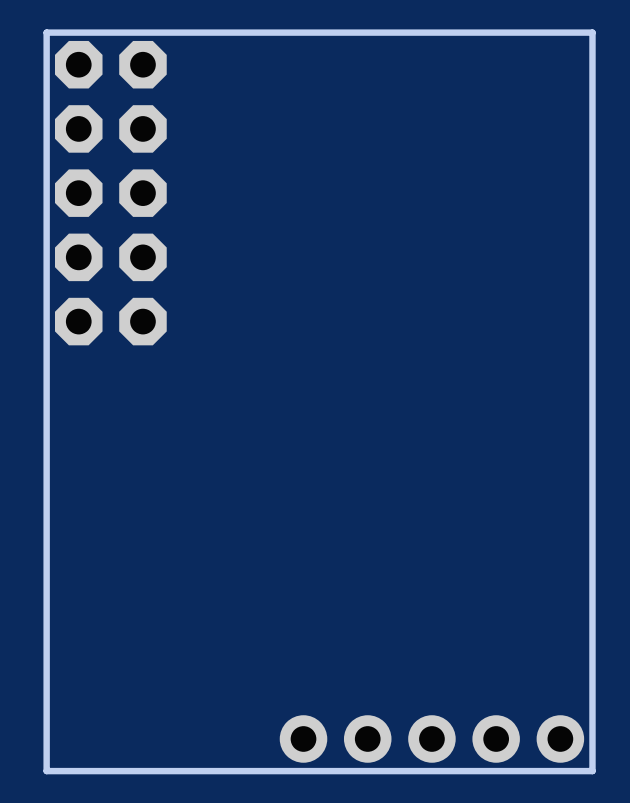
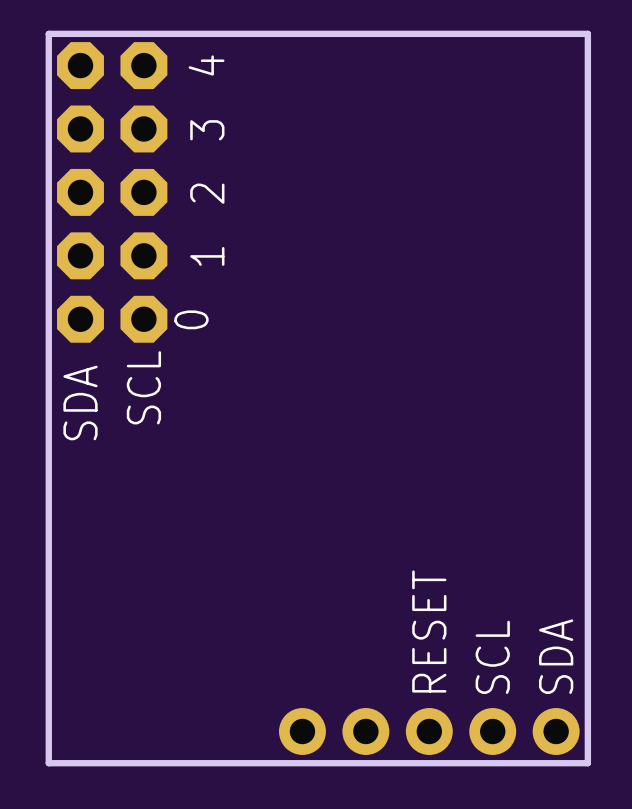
text: none -> 4 (206, 65)
text: none -> 3 (207, 130)
text: none -> 2 (207, 193)
text: none -> 1 (207, 256)
text: none -> 0 (191, 319)
text: none -> SCL (143, 387)
text: none -> SDA (80, 402)
text: none -> RESET (429, 631)
text: none -> SDA (556, 656)
text: none -> SCL (492, 657)

